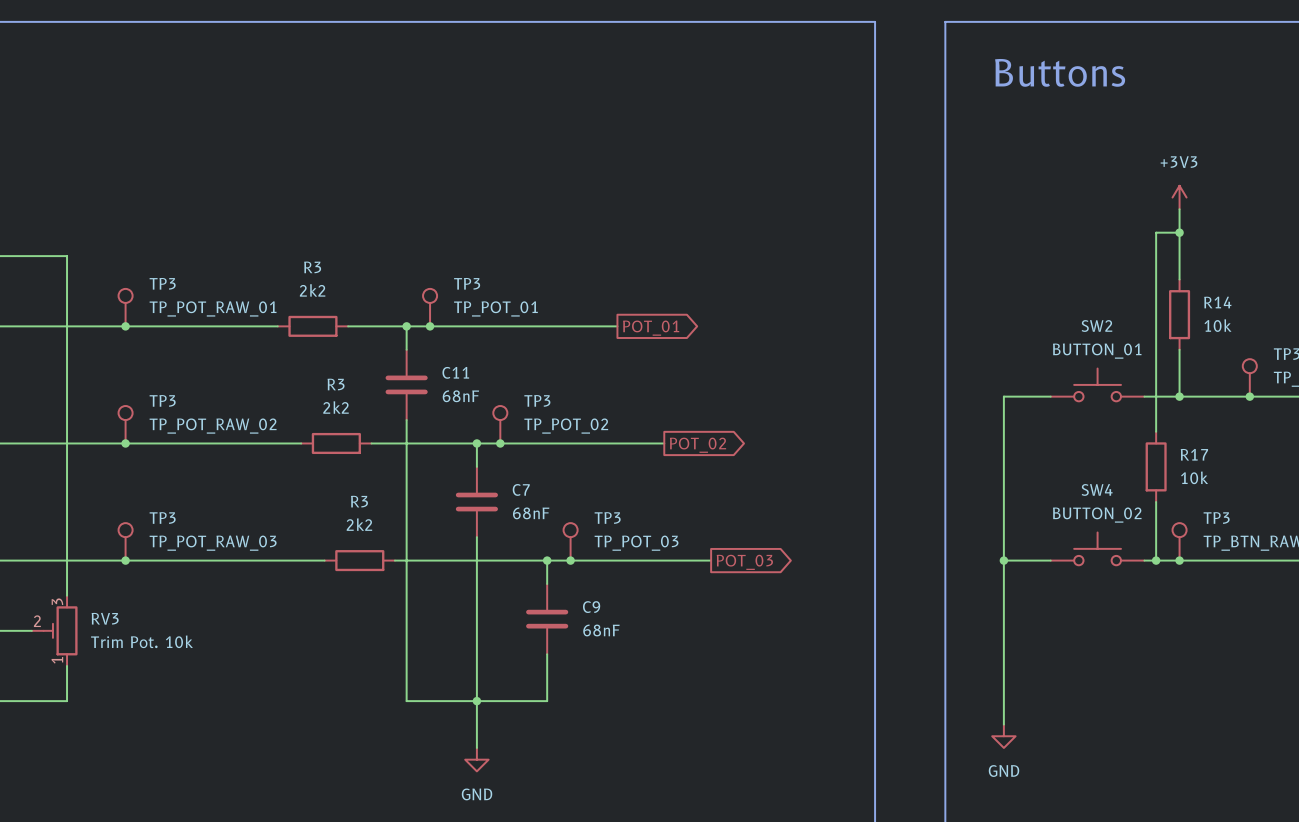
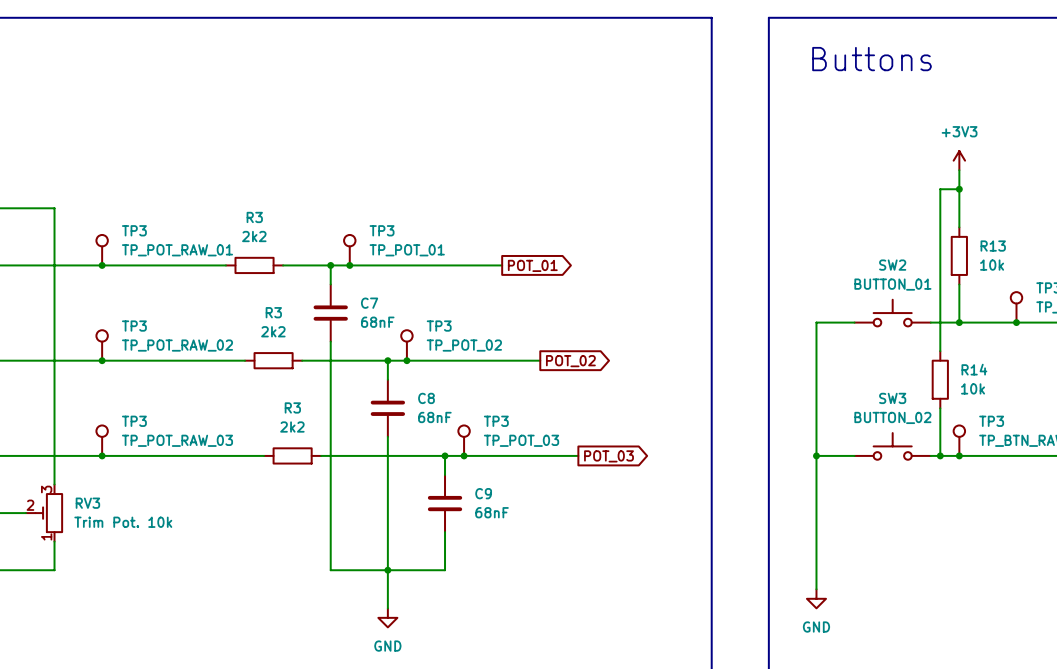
R14 name: R14 (1217, 302) -> R13 (993, 246)
C11 name: C11 (455, 372) -> C7 (369, 303)
R17 name: R17 (1194, 454) -> R14 (974, 369)
C7 name: C7 (521, 489) -> C8 (426, 398)
SW4 name: SW4 (1097, 489) -> SW3 (892, 398)

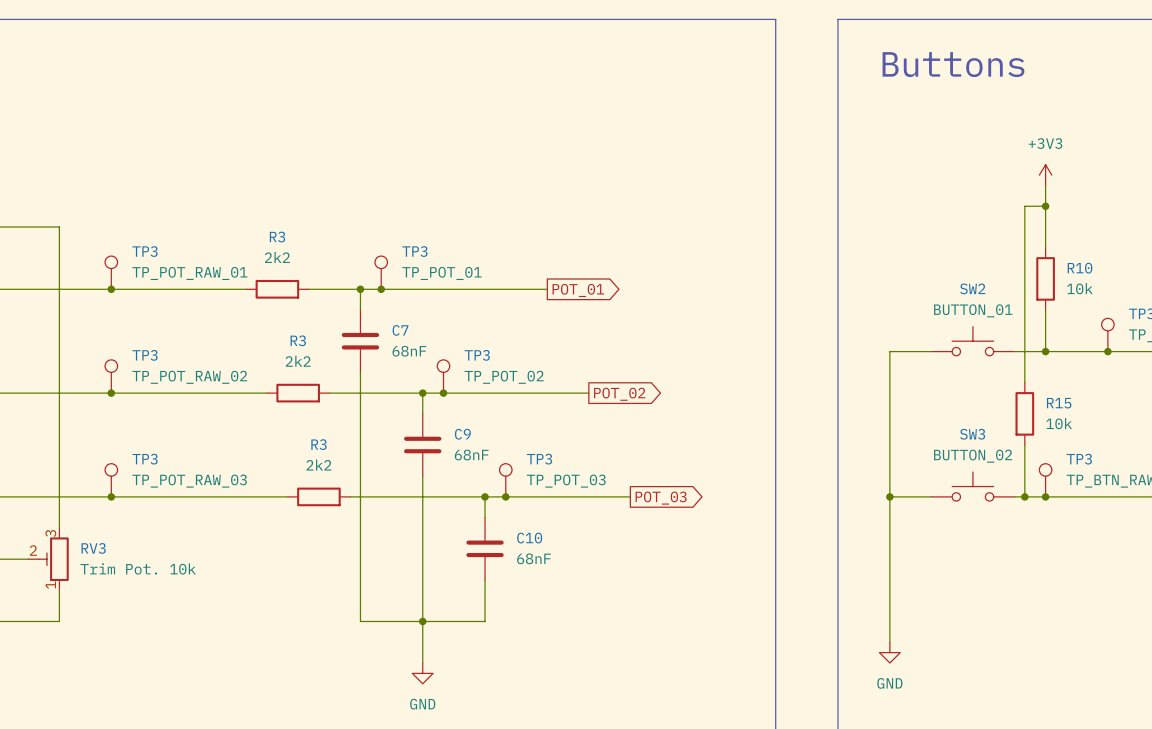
R13 name: R13 (993, 246) -> R10 (1080, 268)
R14 name: R14 (974, 369) -> R15 (1059, 403)
C8 name: C8 (426, 398) -> C9 (462, 434)
C9 name: C9 (483, 493) -> C10 (529, 538)

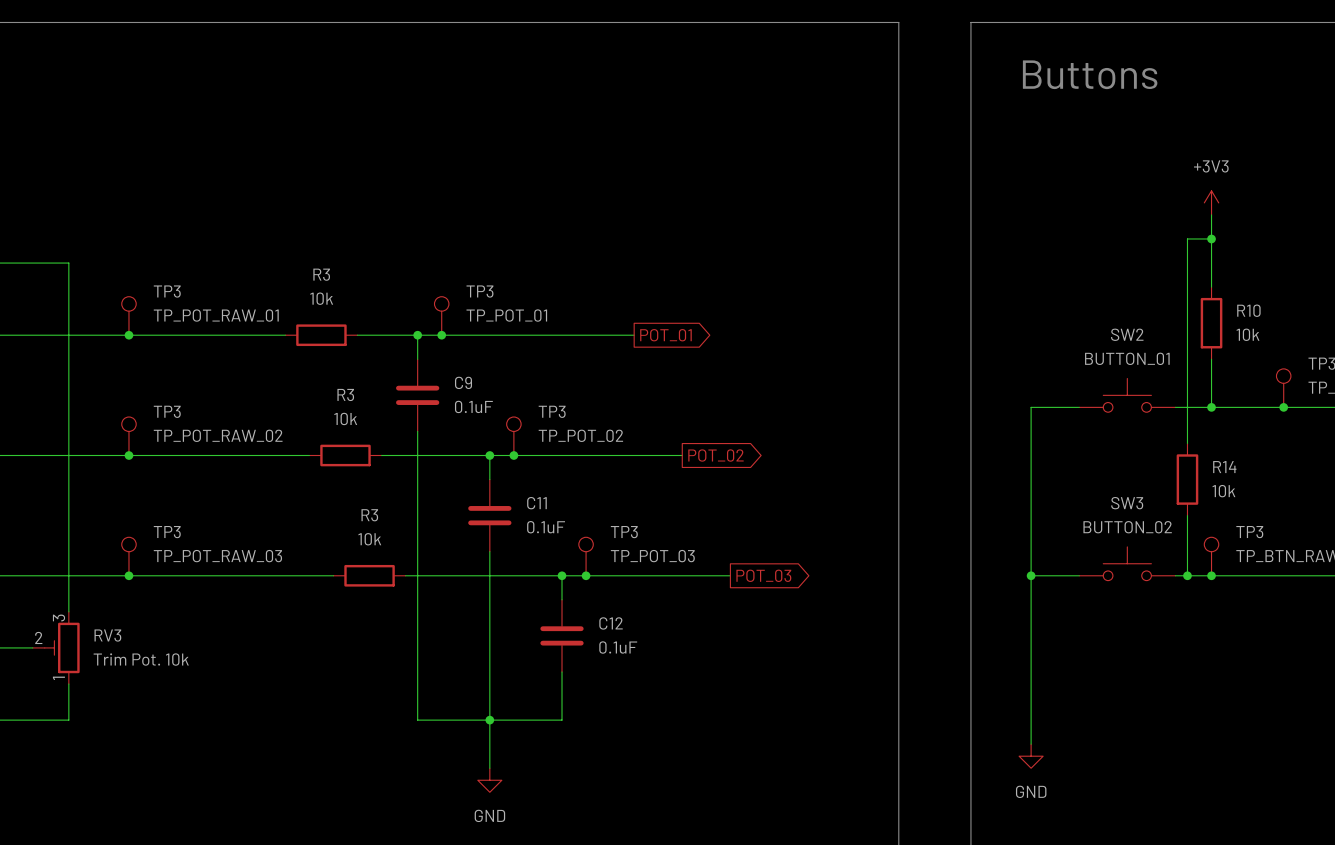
R3 value: 2k2 (277, 257) -> 10k (321, 298)
C7 name: C7 (400, 330) -> C9 (463, 382)
C7 value: 68nF (409, 351) -> 0.1uF (473, 406)
R3 value: 2k2 (298, 361) -> 10k (345, 418)
R15 name: R15 (1059, 403) -> R14 (1224, 467)
C9 name: C9 (462, 434) -> C11 (536, 503)
C9 value: 68nF (471, 455) -> 0.1uF (546, 527)
R3 value: 2k2 (318, 465) -> 10k (369, 539)
C10 name: C10 (529, 538) -> C12 (611, 623)
C10 value: 68nF (533, 558) -> 0.1uF (618, 647)

